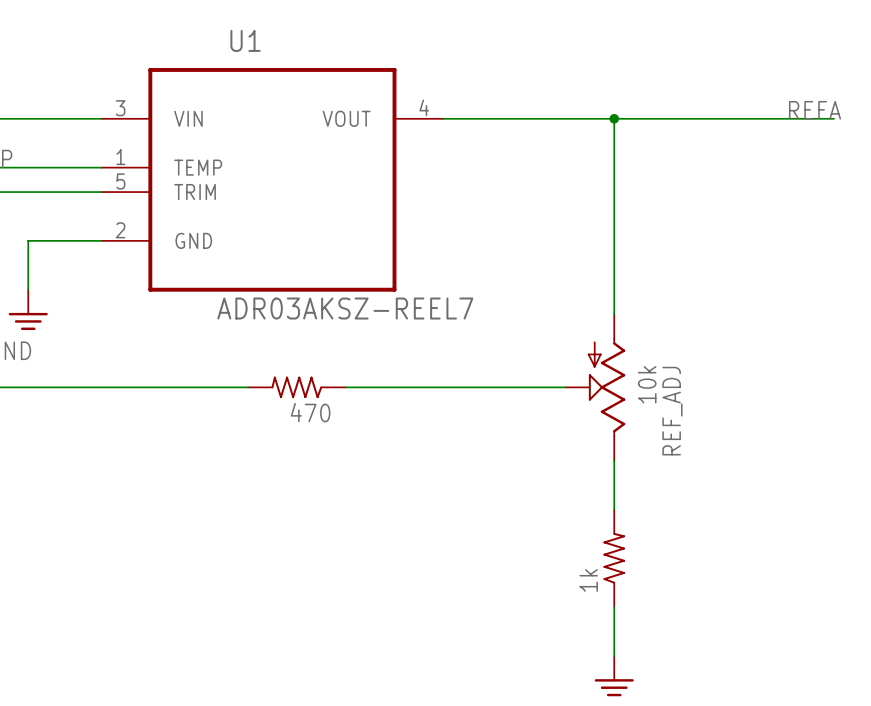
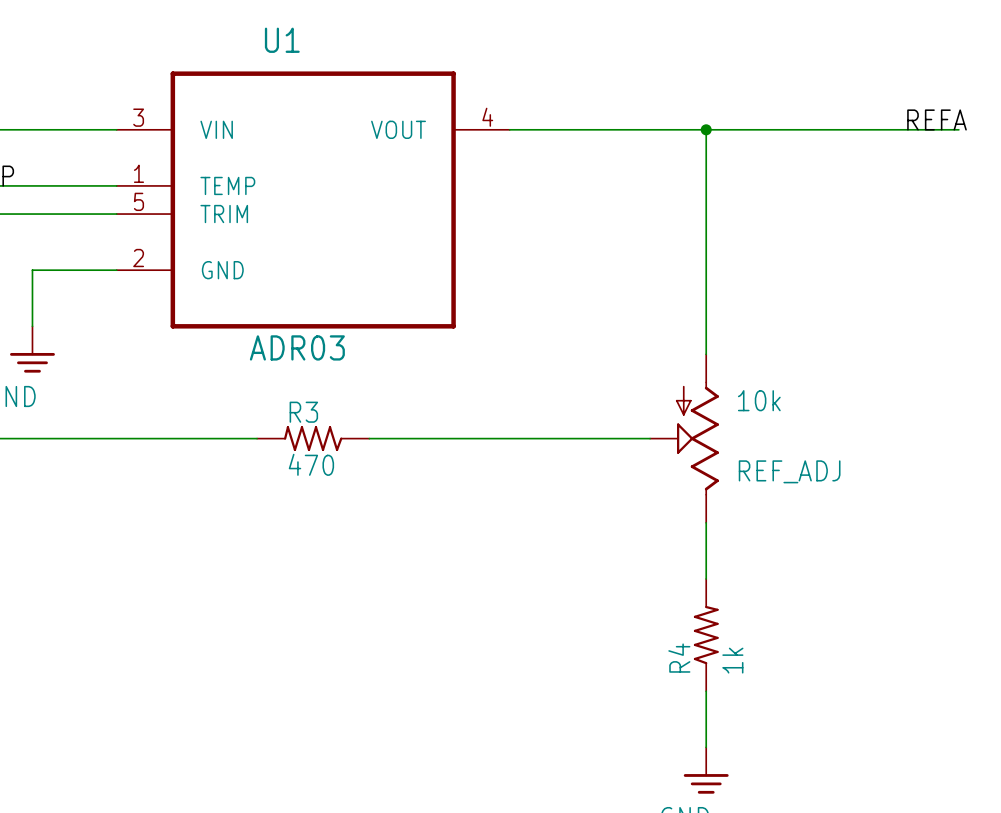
U1 value: ADR03AKSZ-REEL7 (345, 308) -> ADR03 (297, 347)
REF_ADJ value rotation: 0° (647, 384) -> 90° clockwise (759, 400)
R3: none -> 470 (313, 438)
part: 470 (296, 387) -> none
REF_ADJ name rotation: 0° (672, 411) -> 90° clockwise (789, 471)
R4 name: none -> R4 (679, 658)
R4 value position: 1k (588, 580) -> 1k (732, 660)

